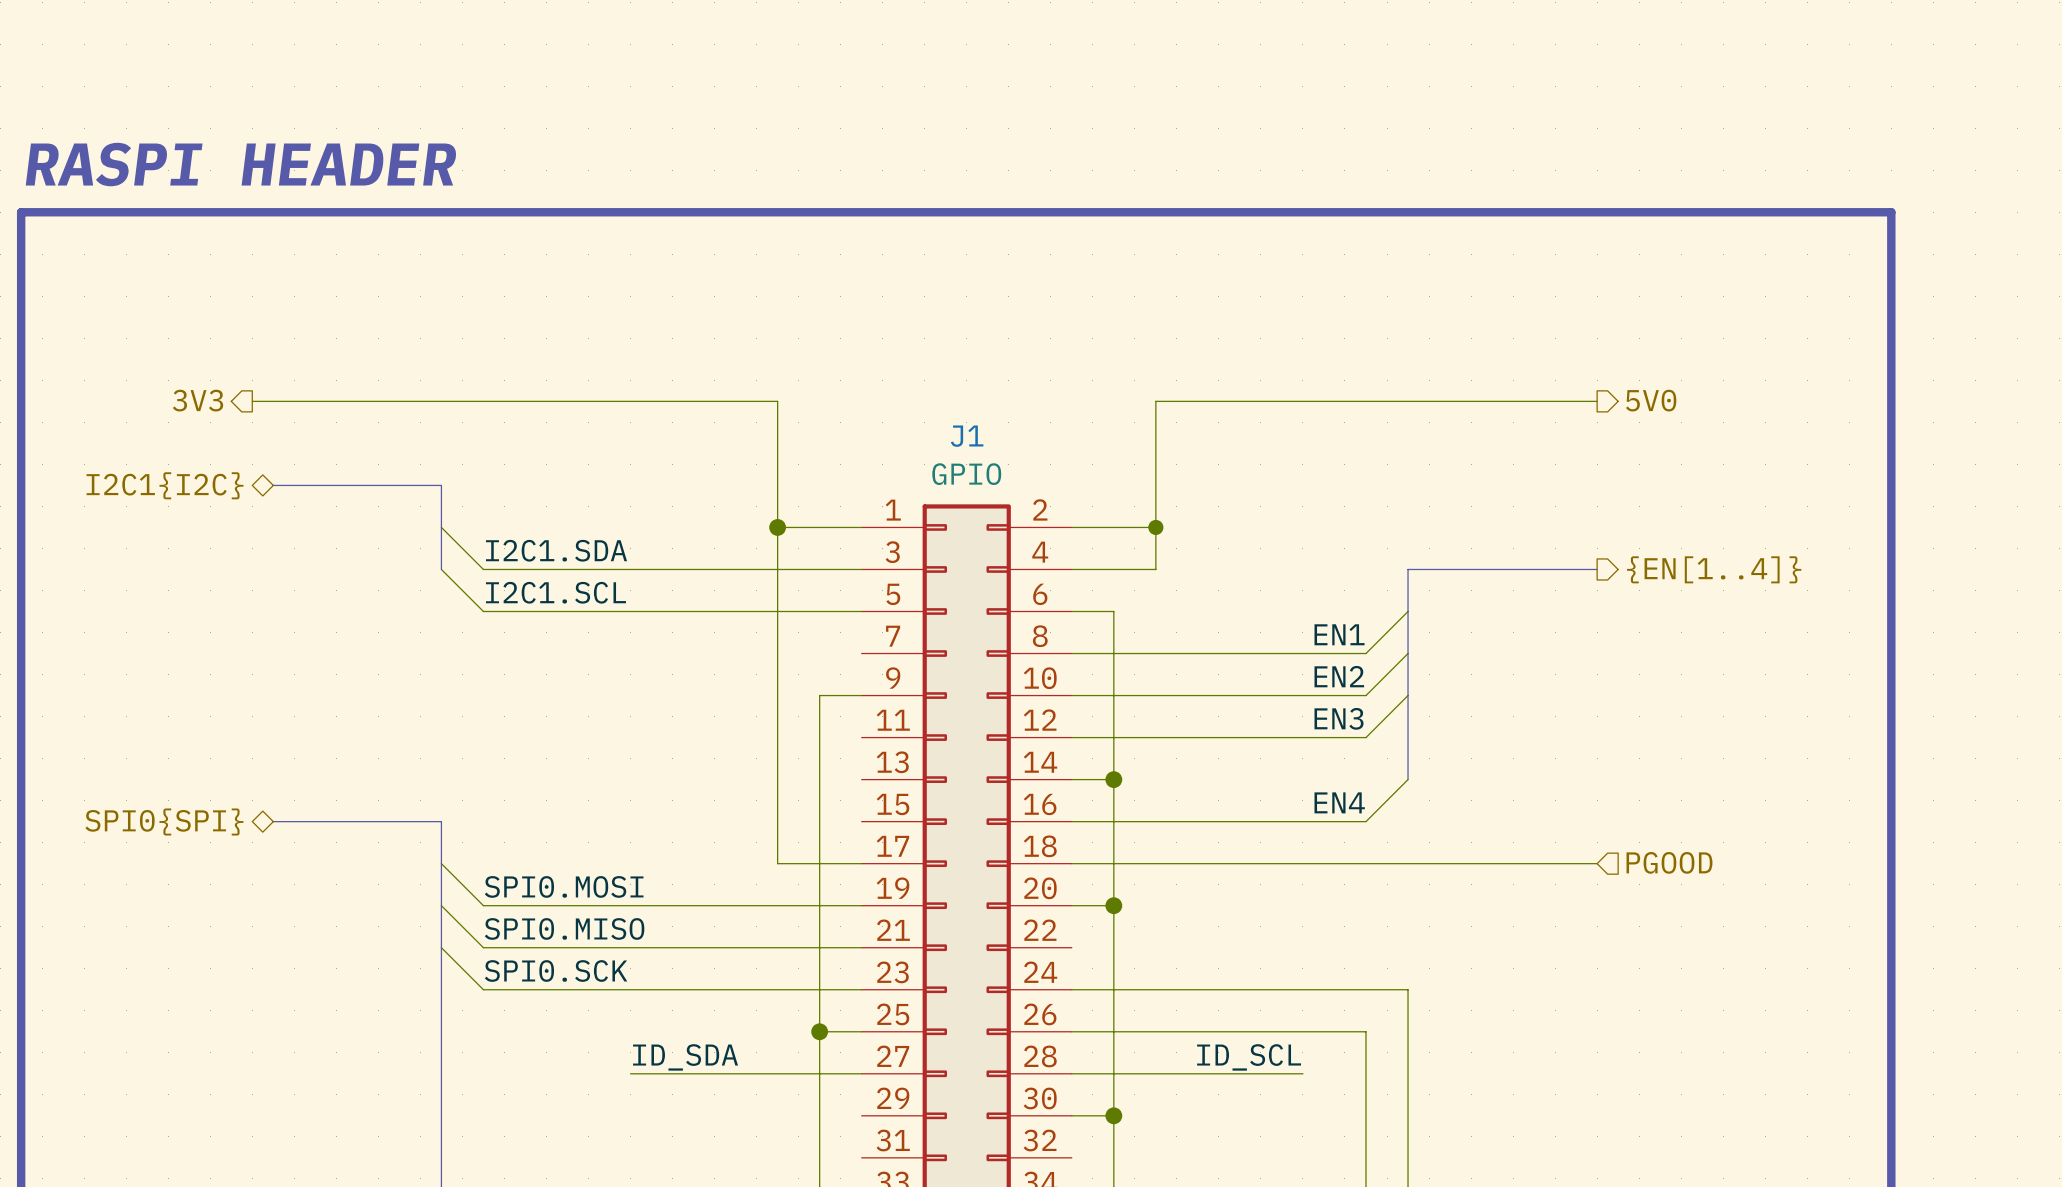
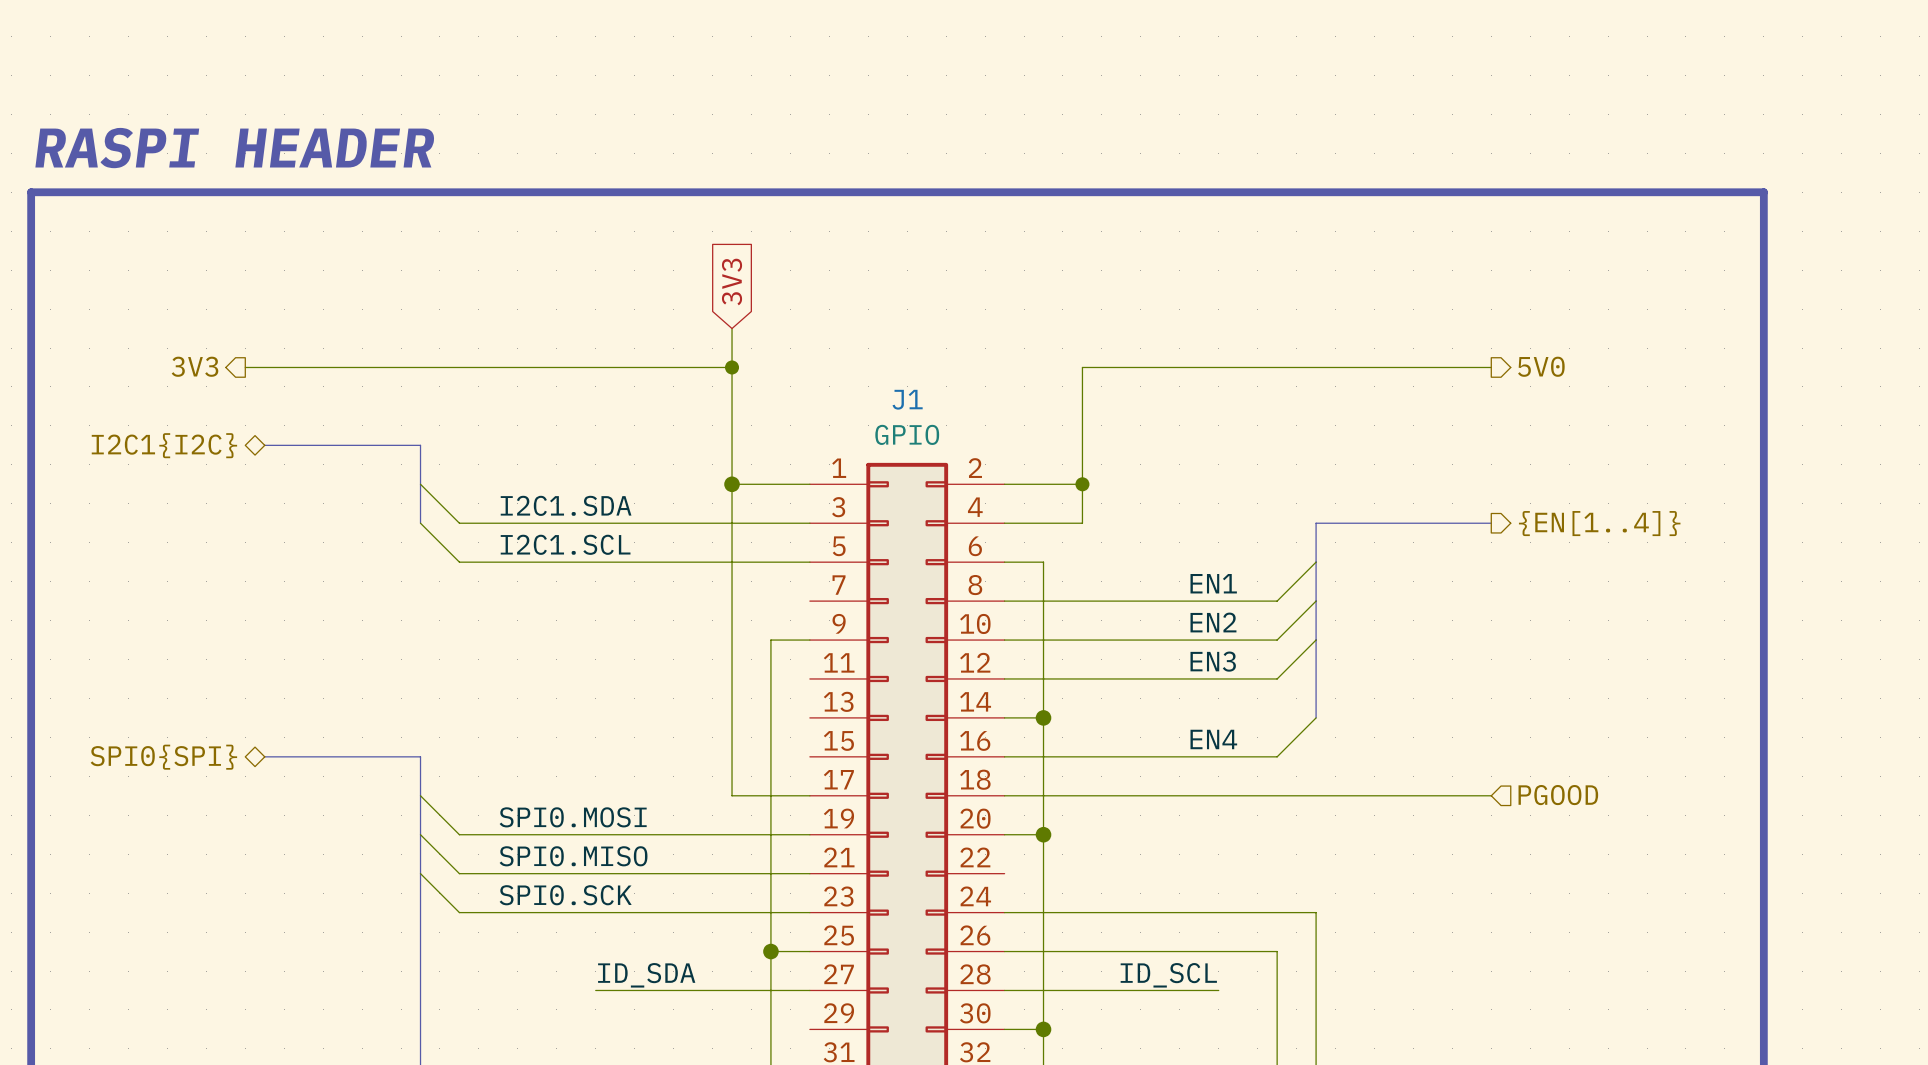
global label: none -> 3V3 (732, 282)
wire: none -> (732, 328) (732, 367)
junction: none -> (732, 367)
label position: I2C1.SDA (556, 550) -> I2C1.SDA (566, 505)
label position: I2C1.SCL (555, 592) -> I2C1.SCL (565, 544)
label position: EN1 (1339, 634) -> EN1 (1213, 583)
label position: EN2 (1339, 676) -> EN2 (1213, 622)
label position: EN3 (1339, 718) -> EN3 (1213, 661)
label position: EN4 (1339, 802) -> EN4 (1213, 739)
label position: SPI0.MOSI (564, 886) -> SPI0.MOSI (573, 817)
label position: SPI0.MISO (564, 928) -> SPI0.MISO (573, 856)
label position: SPI0.SCK (556, 970) -> SPI0.SCK (565, 895)

